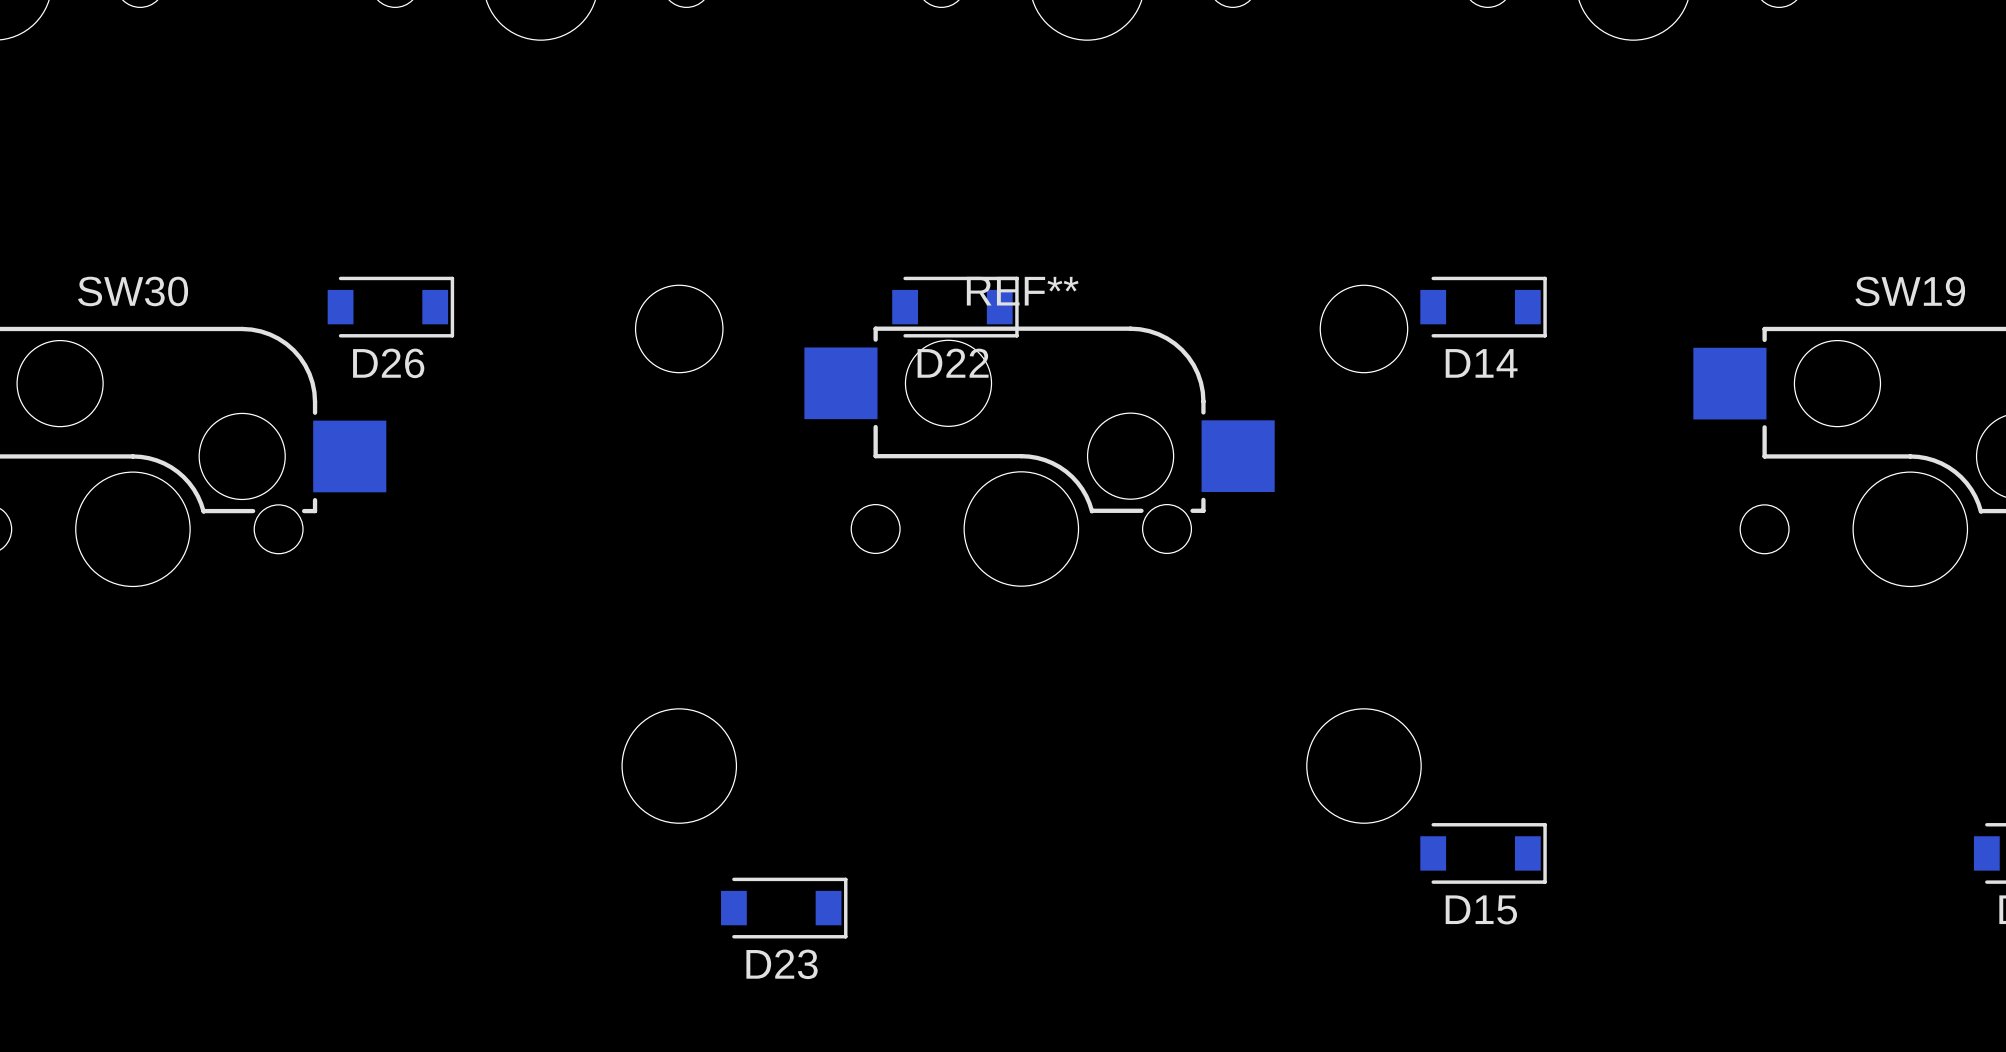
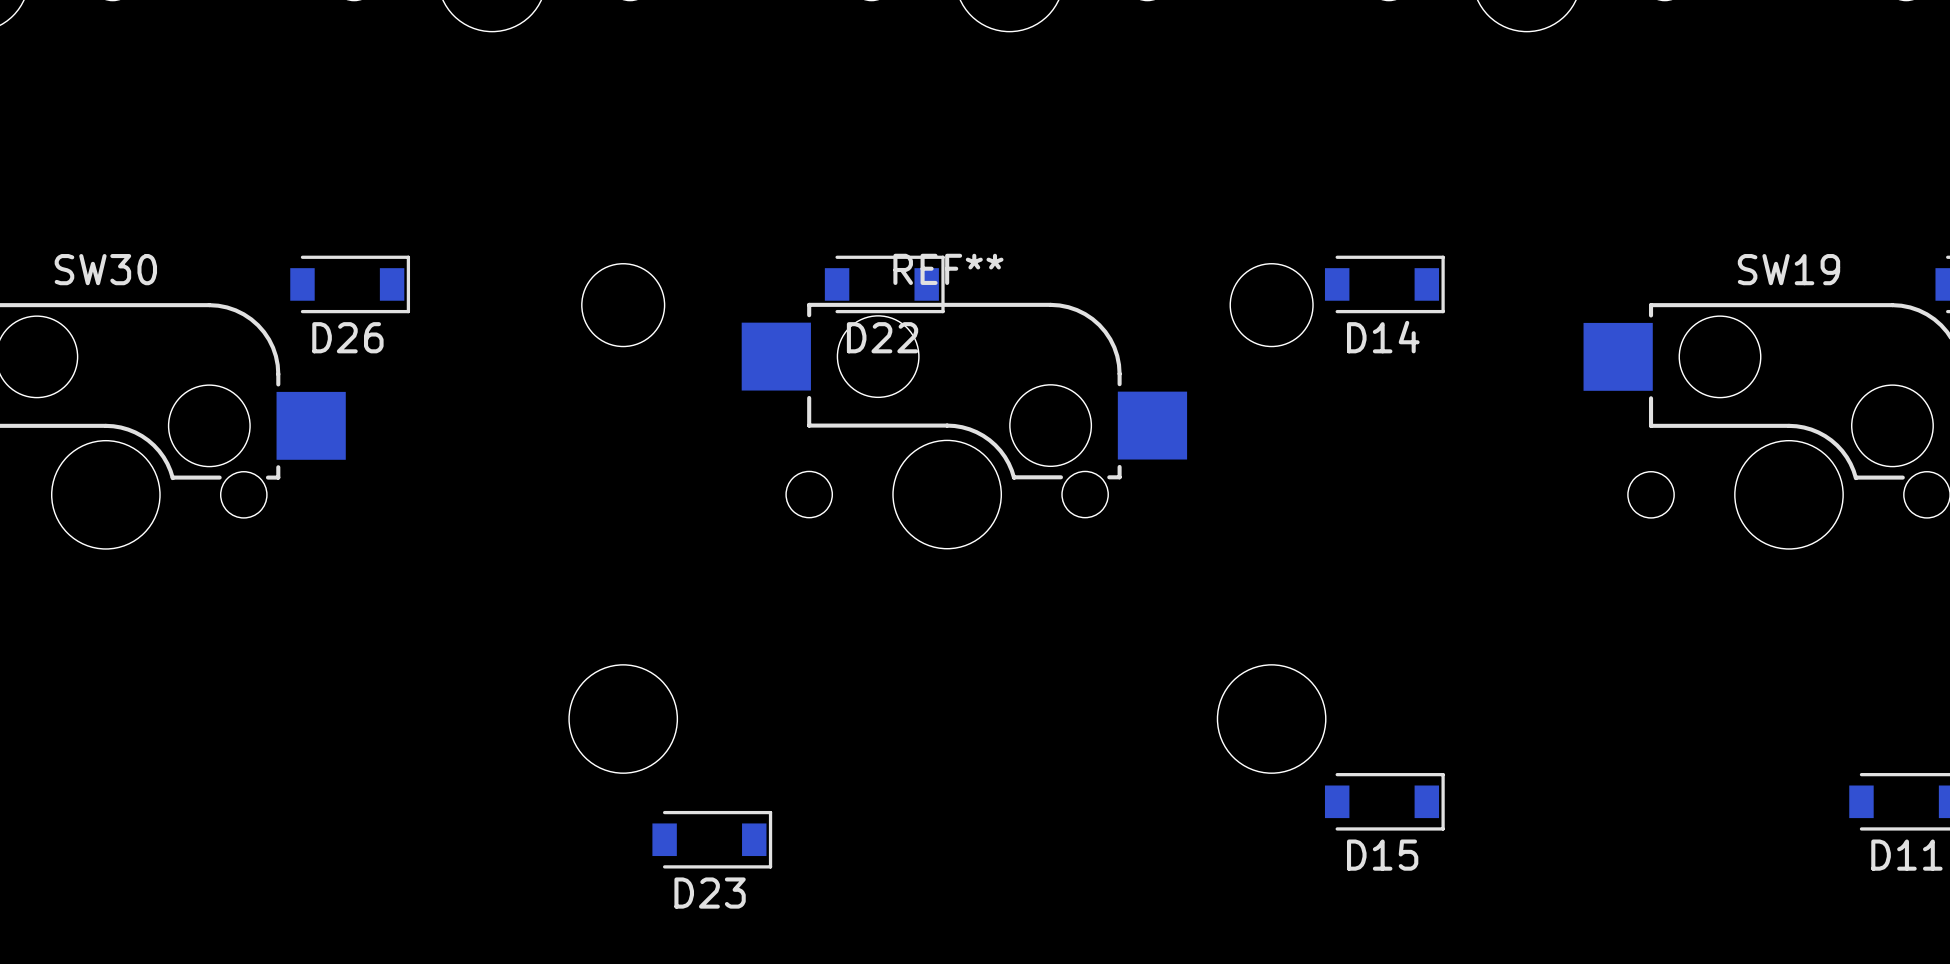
D23 position: (784, 908) -> (712, 839)

